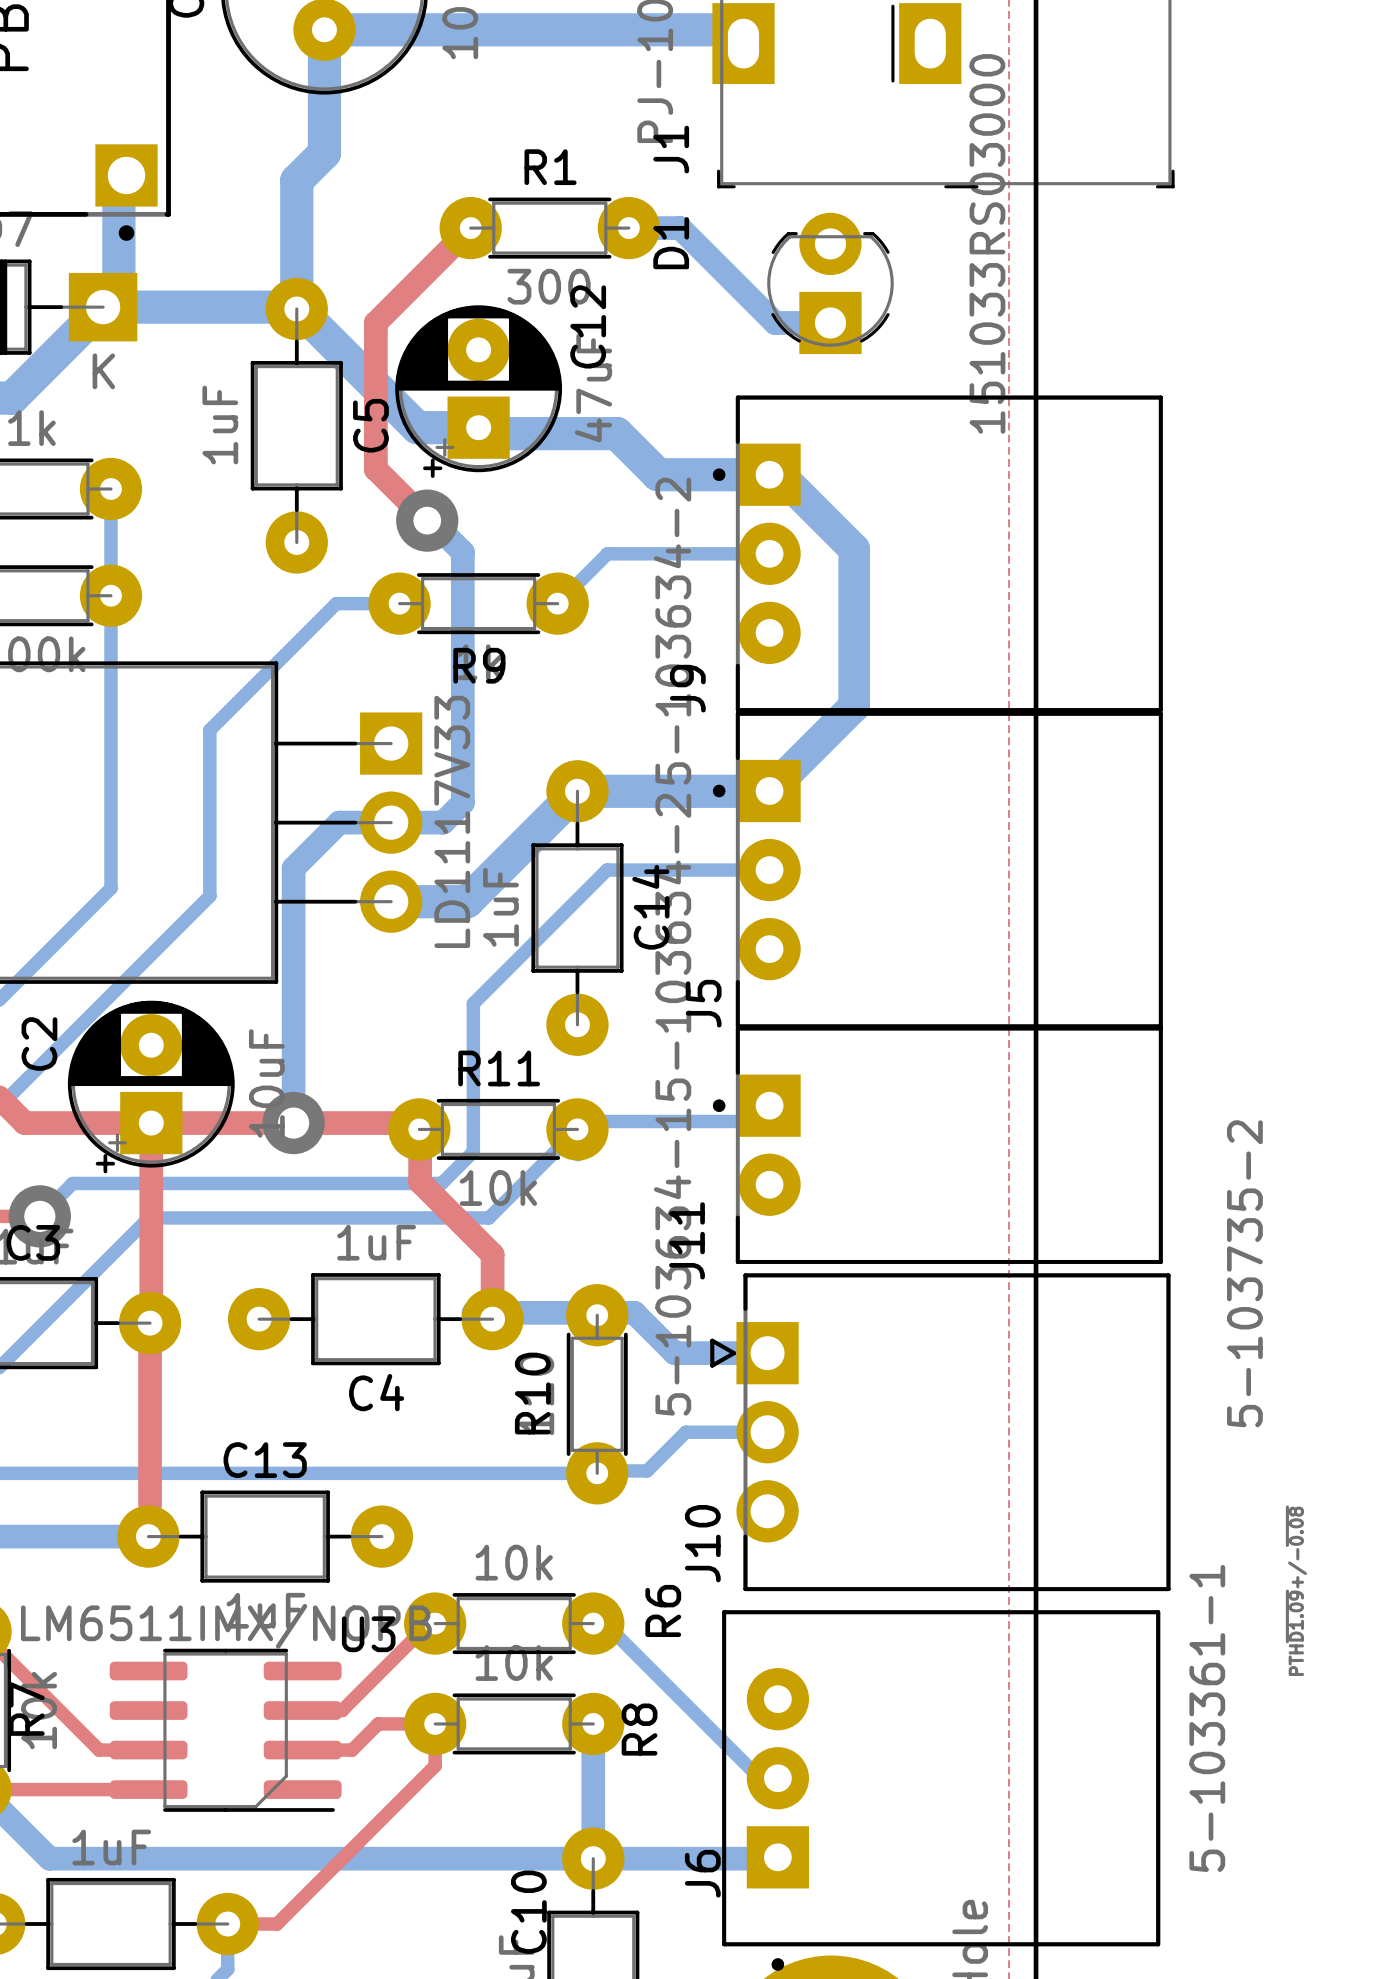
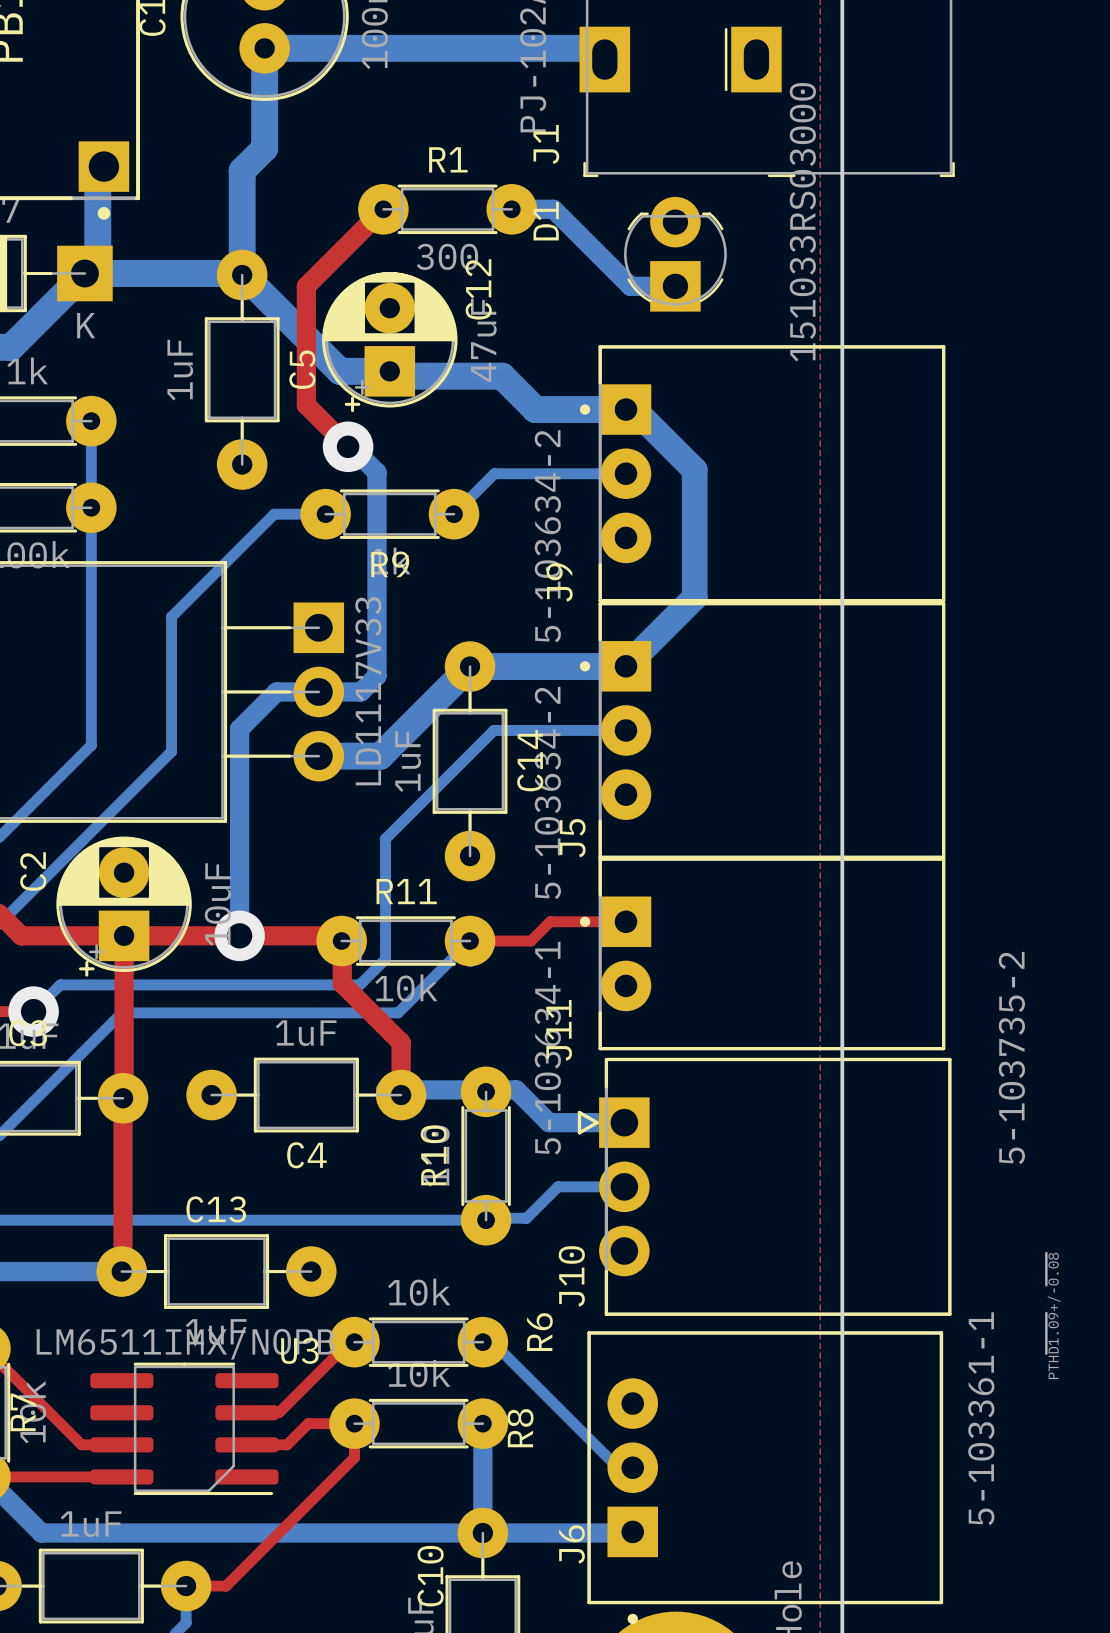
bottom track: (769, 1105) (753, 1121) (585, 1121) (577, 1129) -> none
top track: none -> (625, 921) (550, 921) (531, 941) (470, 941)

